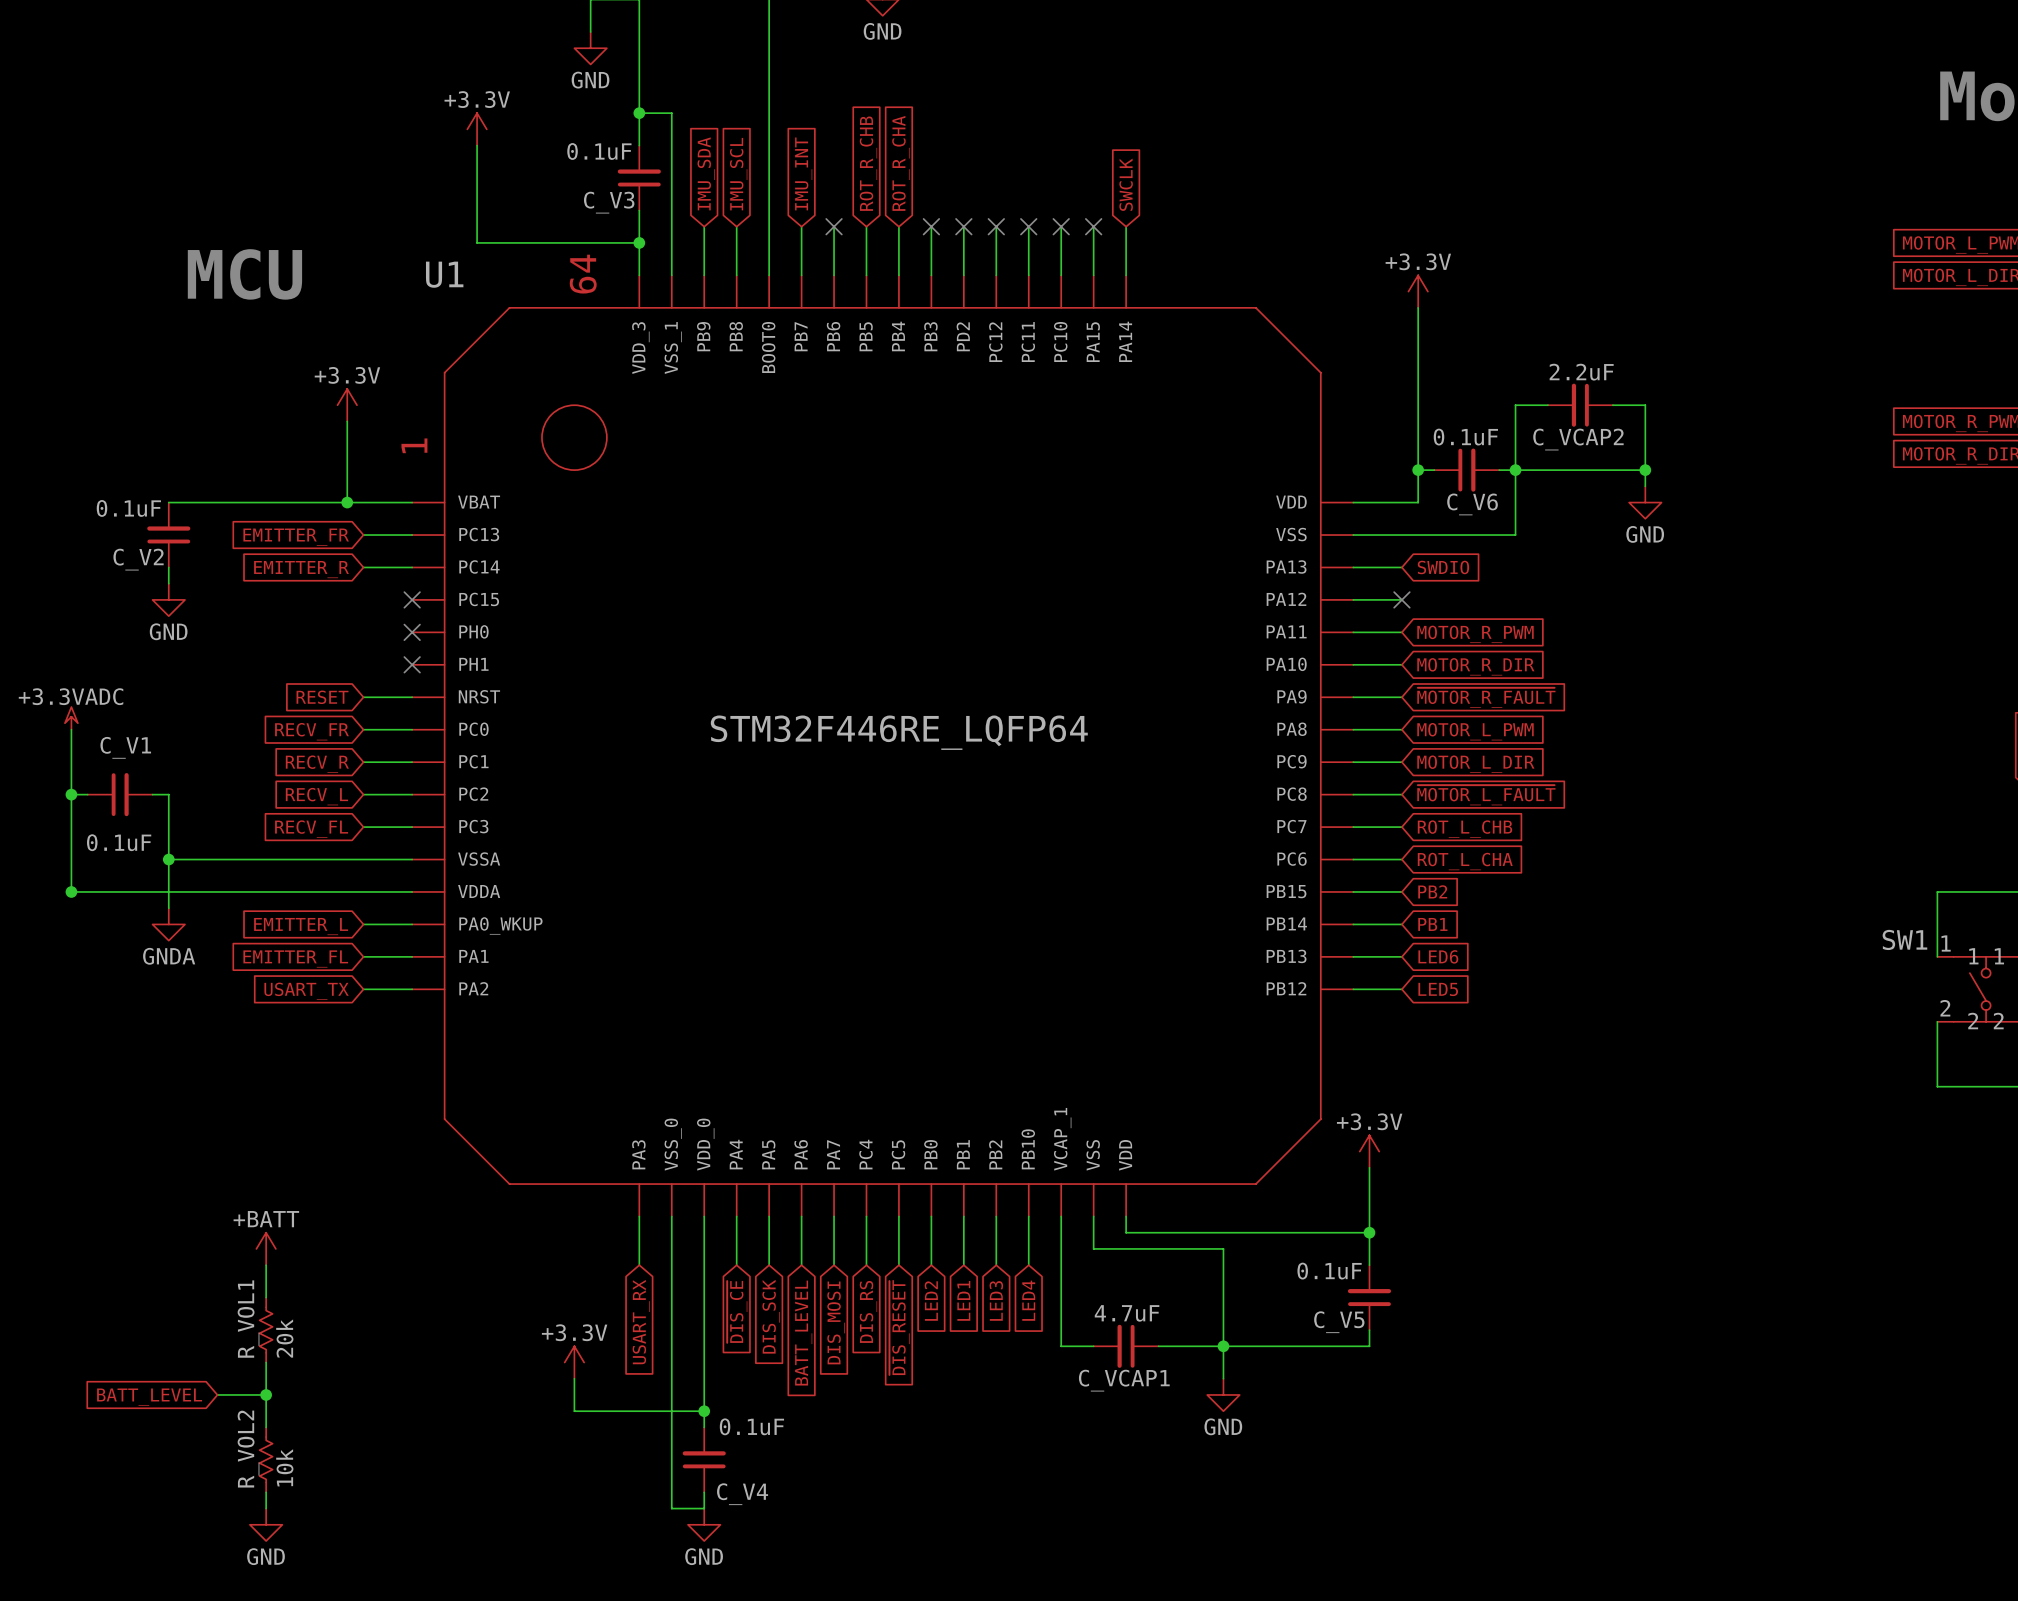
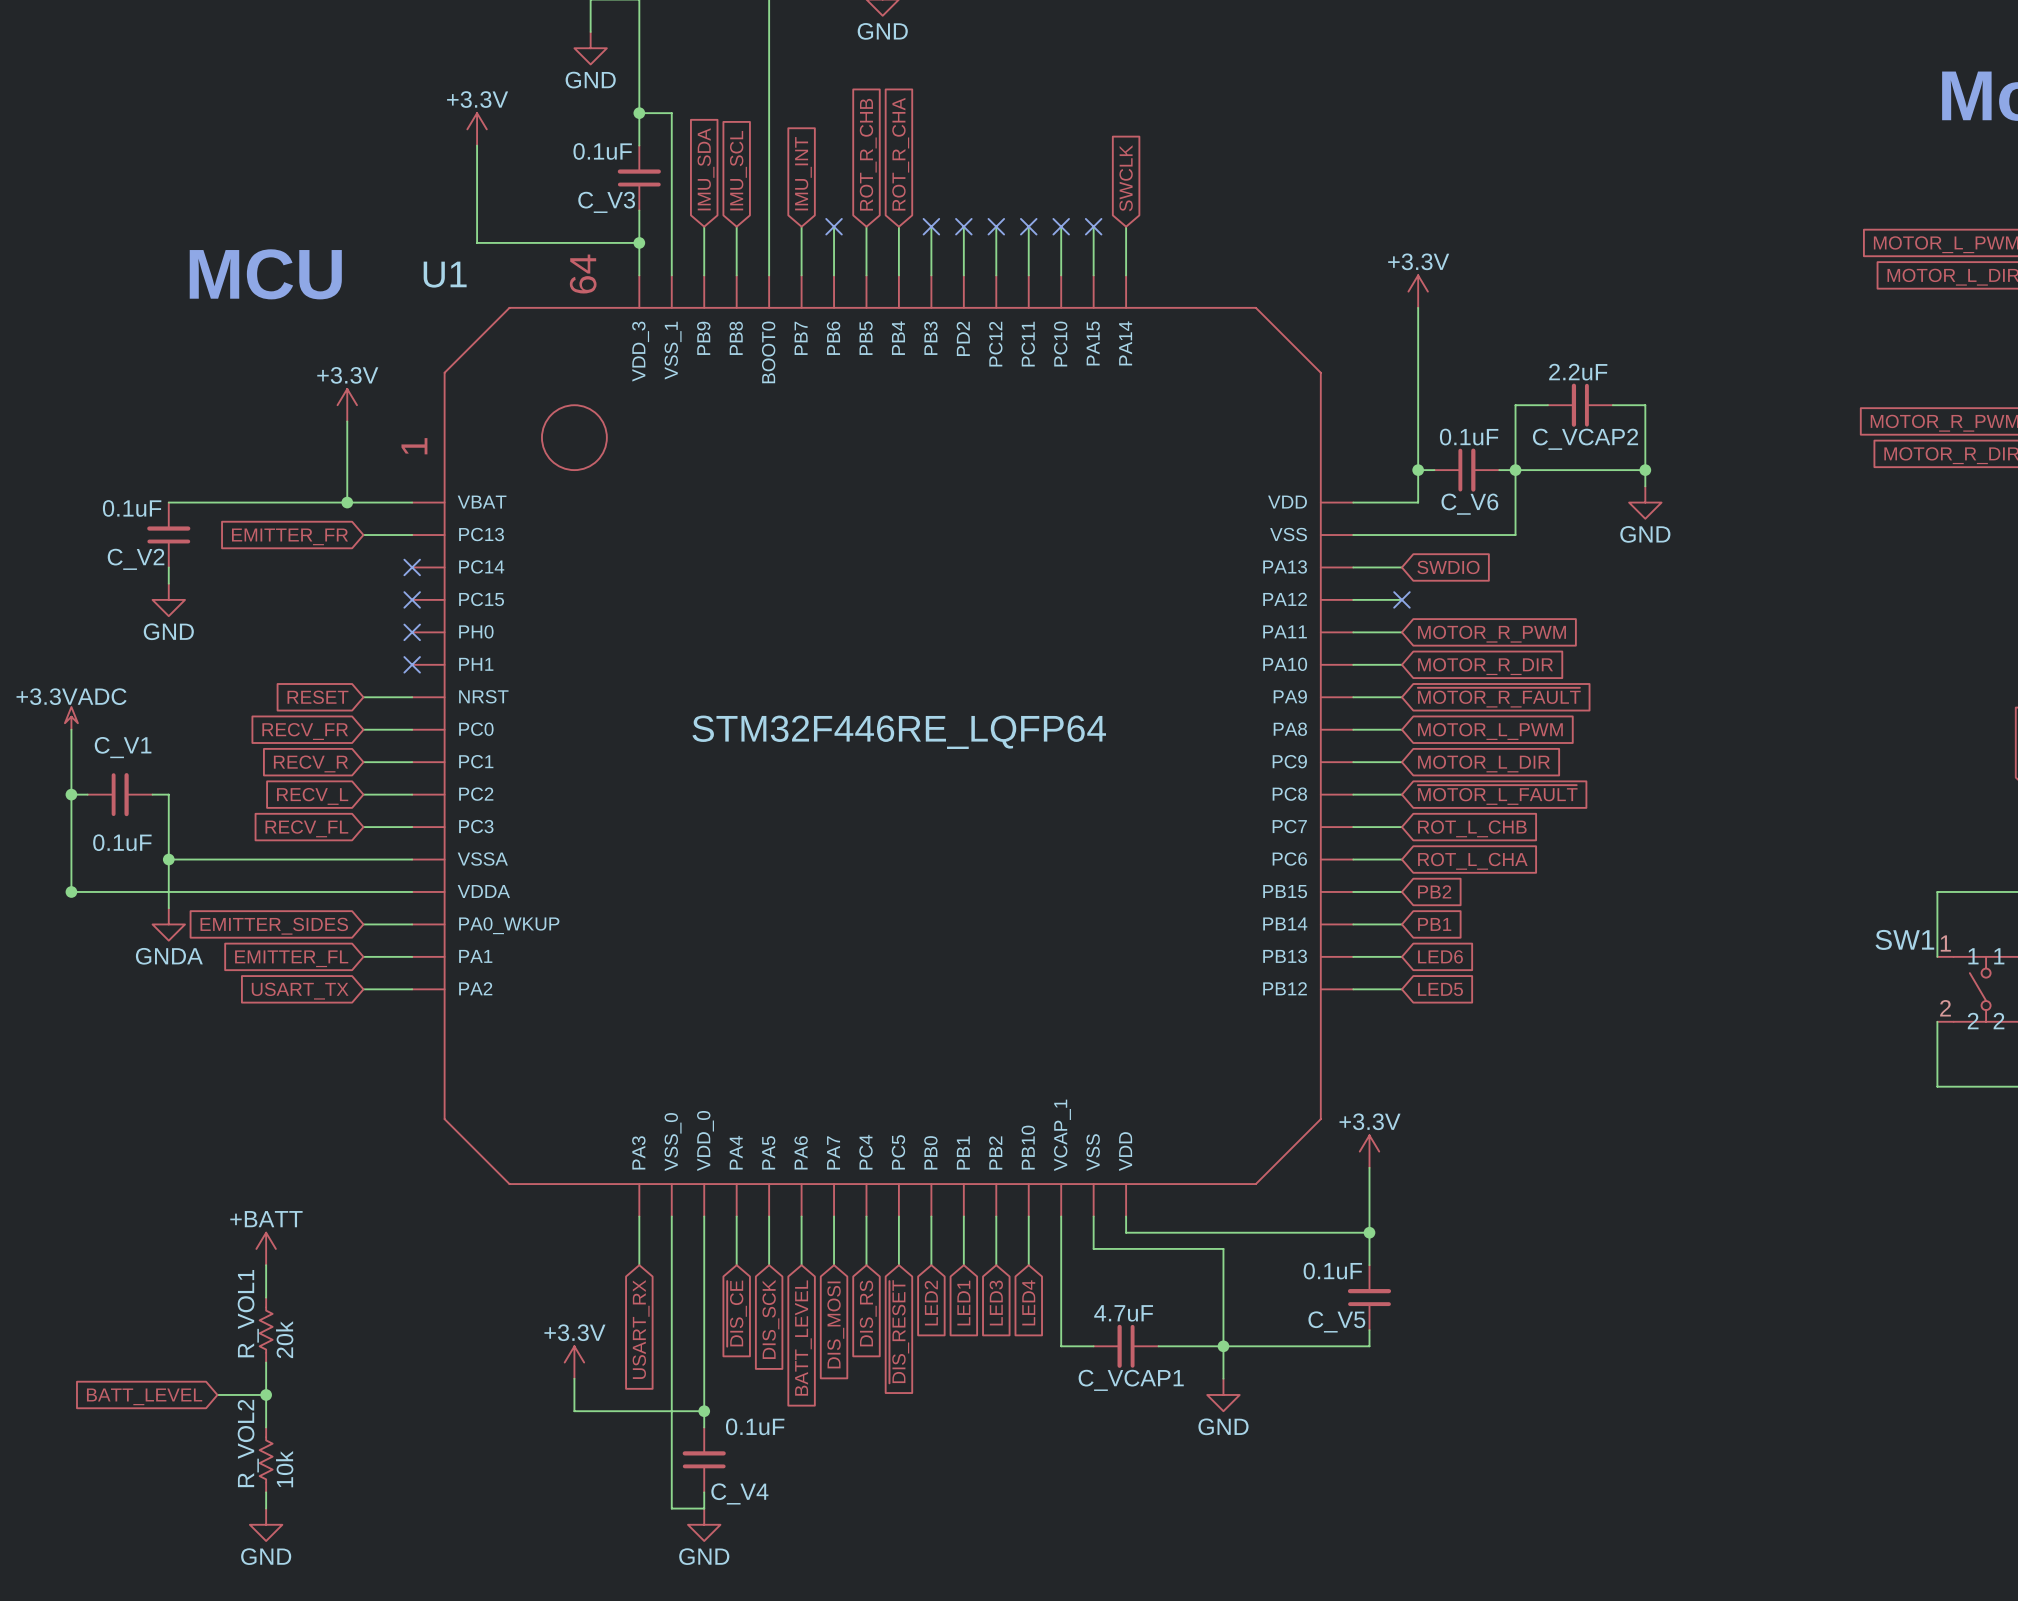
wire: (363, 567) (412, 567) -> none
no-connect mark: none -> (412, 567)
global label: EMITTER_R (301, 569) -> none
global label: EMITTER_L (301, 926) -> EMITTER_SIDES (274, 926)

